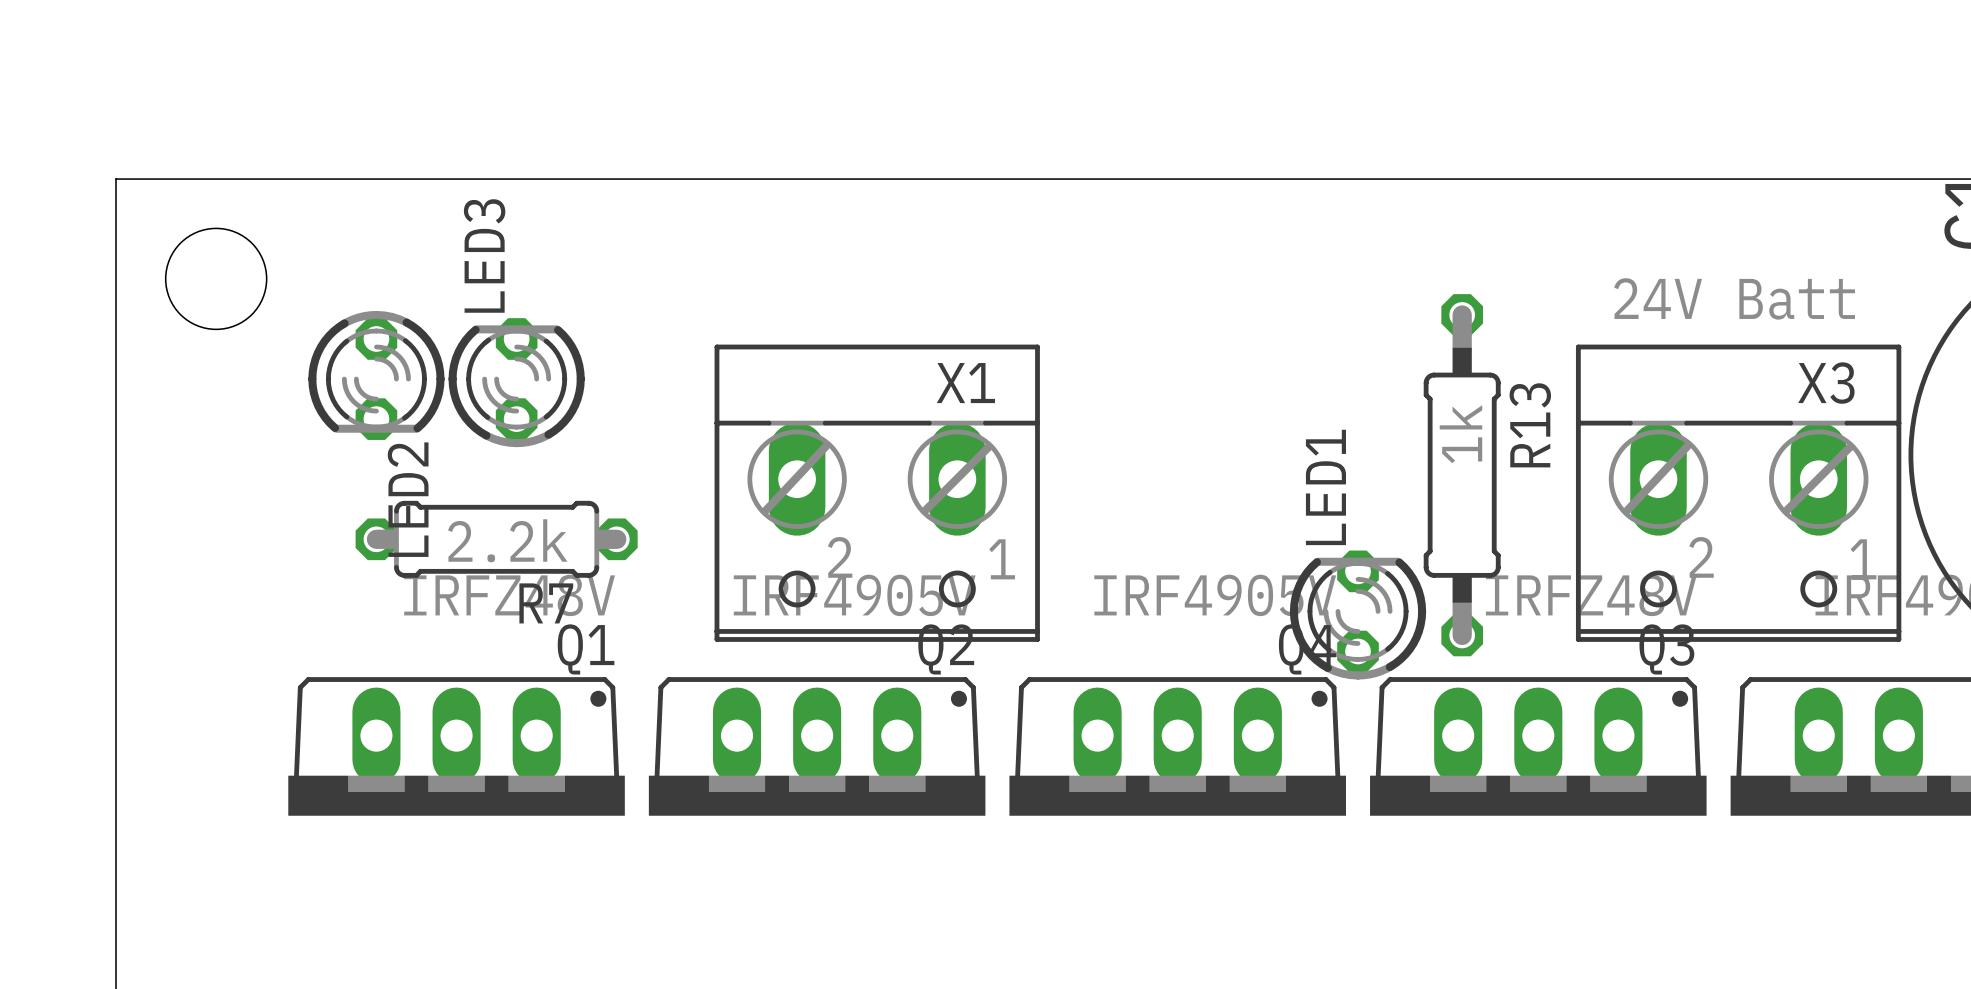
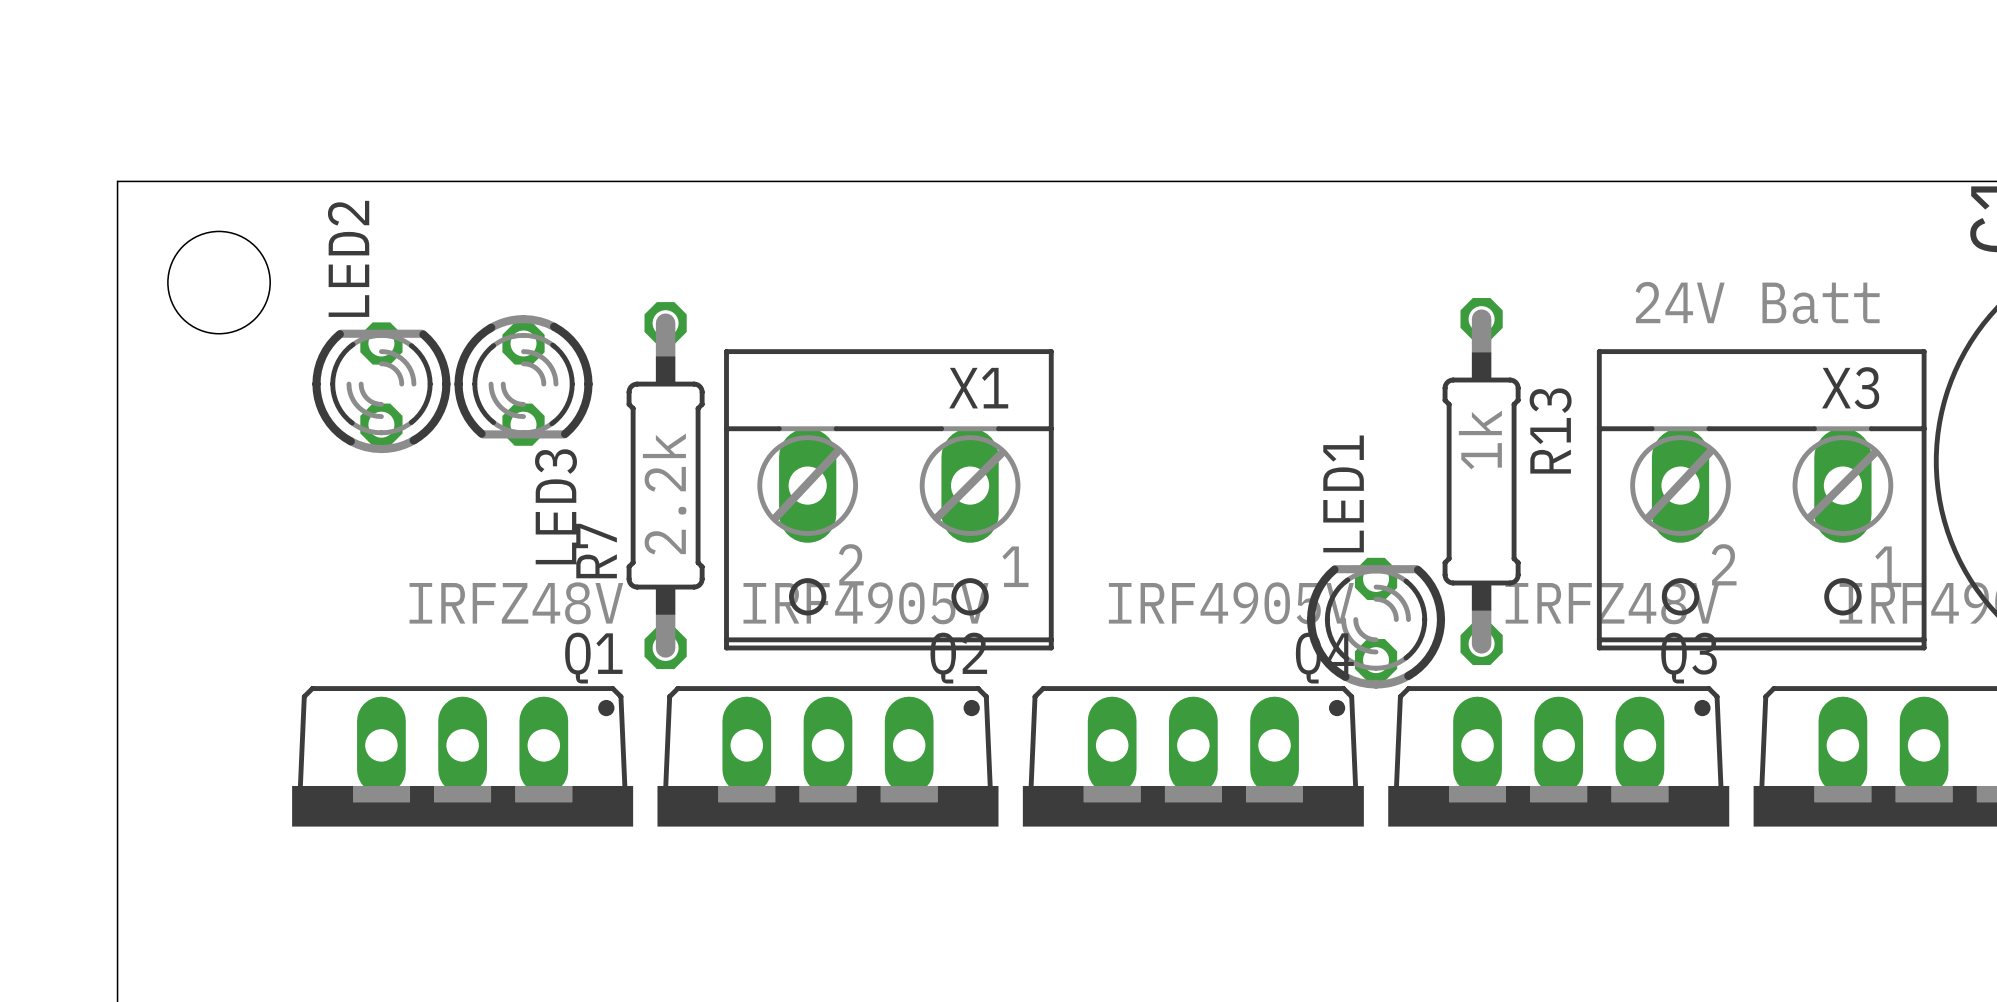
LED2 rotation: 0° (376, 375) -> 180° (381, 387)
LED3 rotation: 0° (516, 382) -> 180° (523, 380)
R7 footprint: [355, 500, 638, 578] -> [626, 302, 705, 670]
R7 name position: R7 (546, 603) -> R7 (596, 551)

